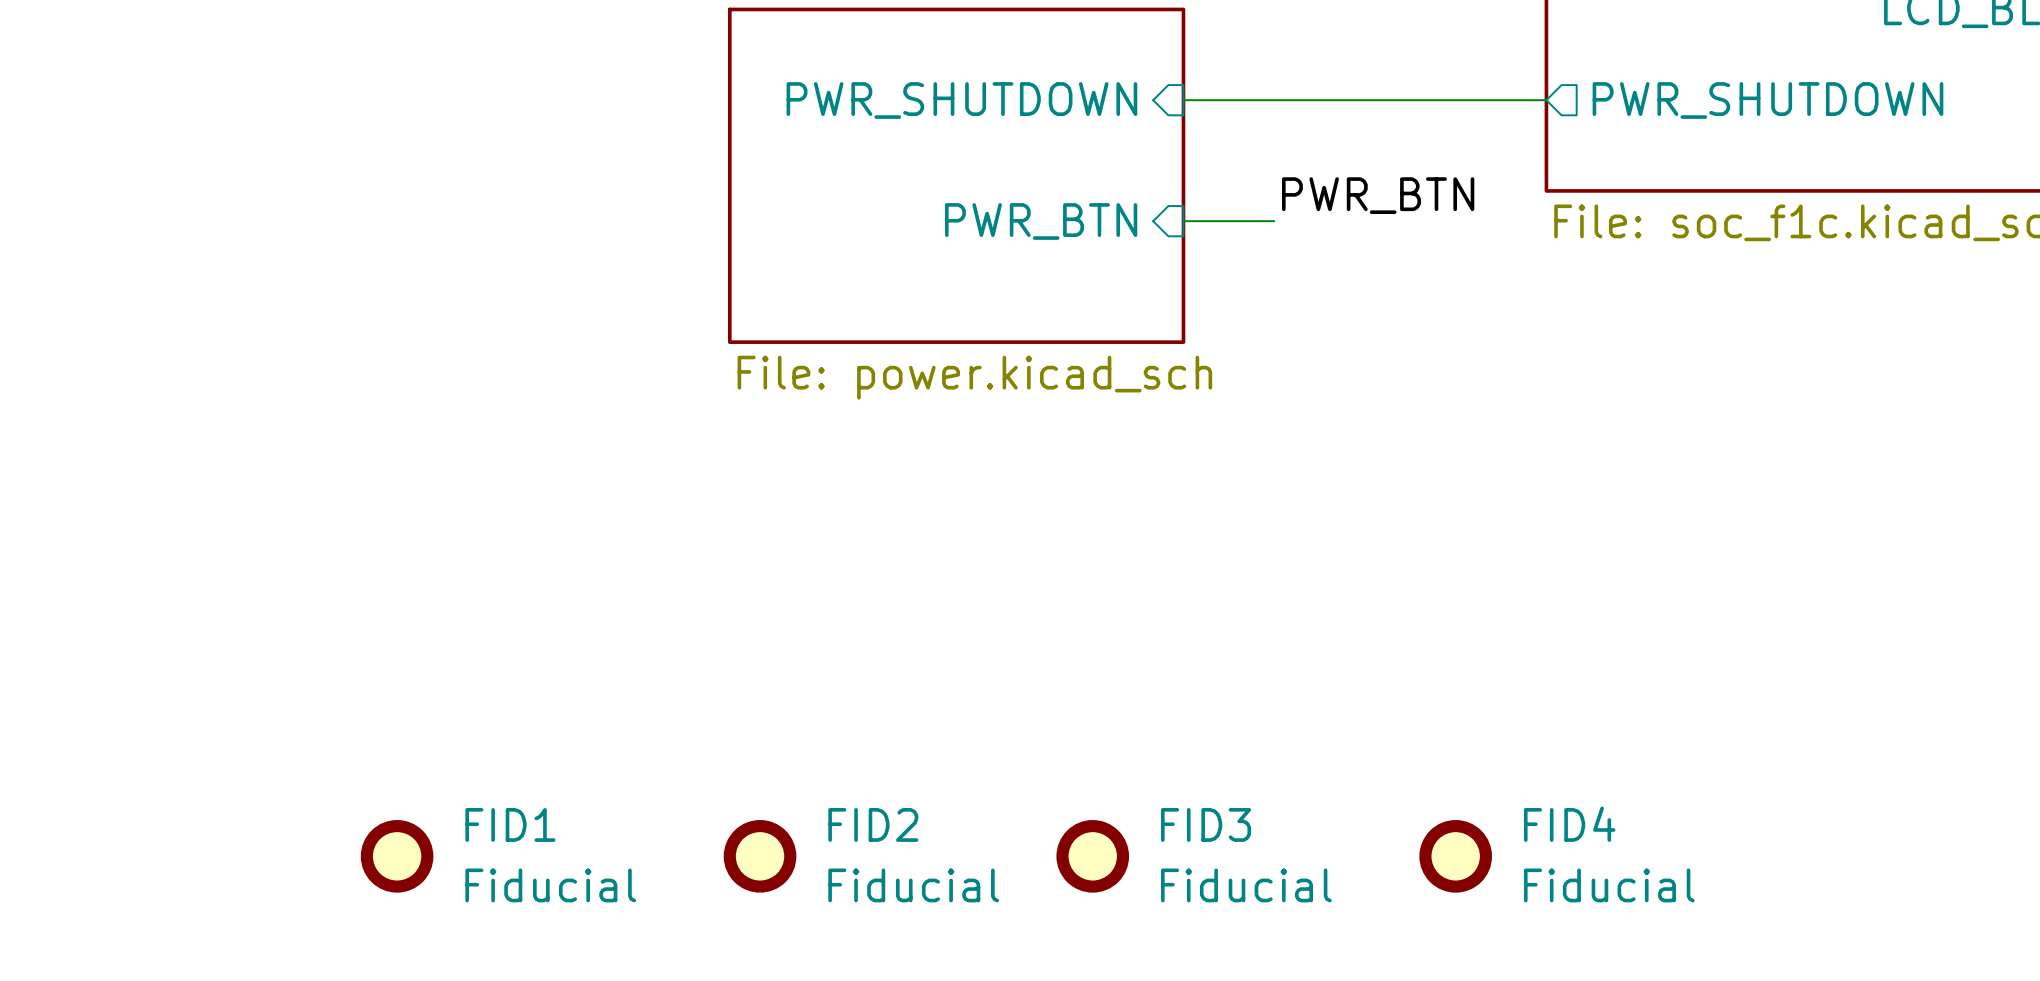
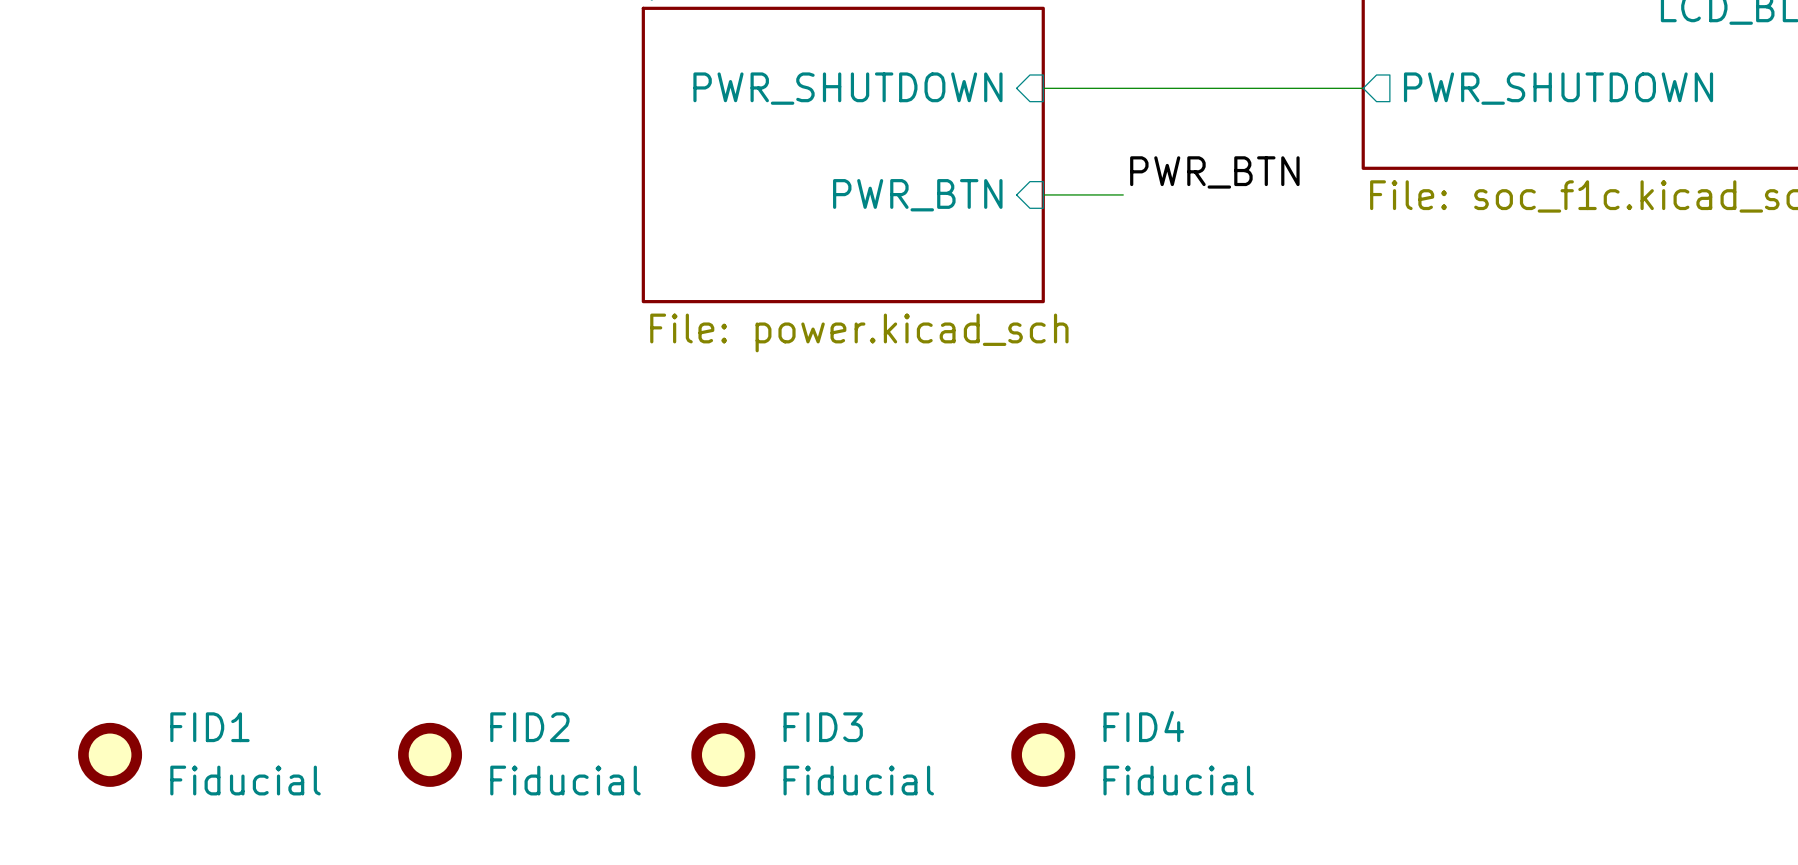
FID1 position: (397, 856) -> (110, 754)
FID2 position: (760, 856) -> (430, 754)
FID3 position: (1092, 856) -> (723, 754)
FID4 position: (1455, 856) -> (1043, 754)

